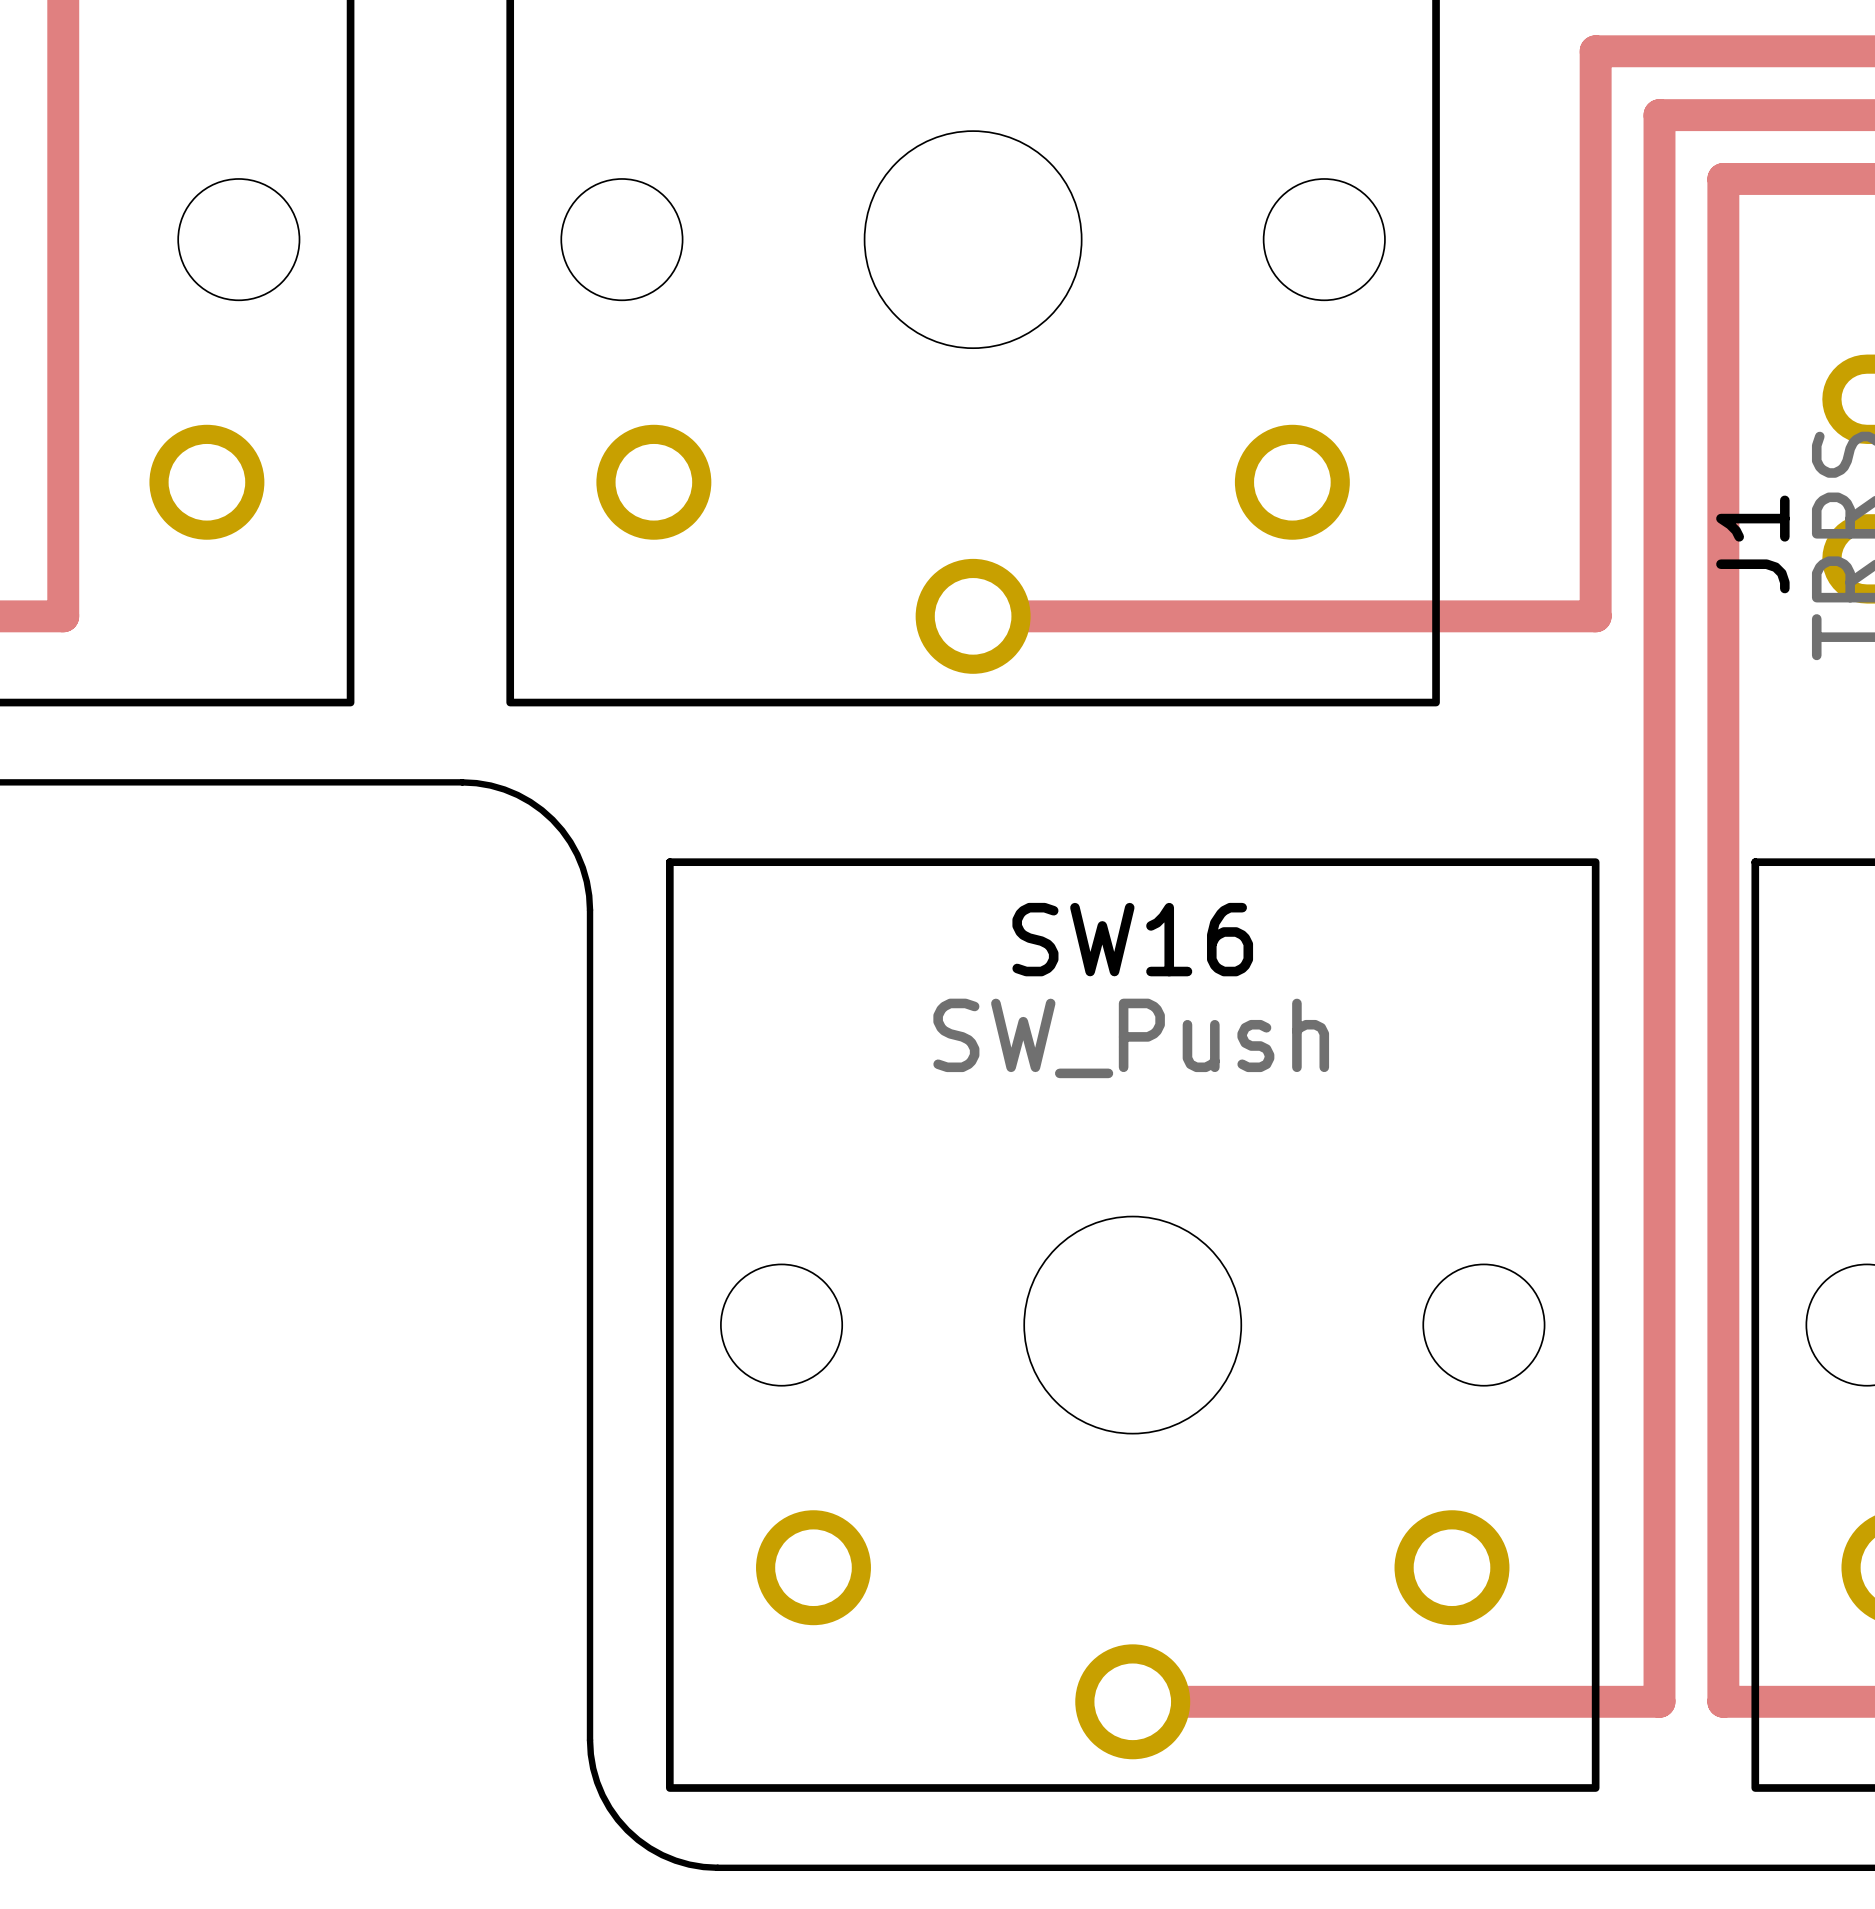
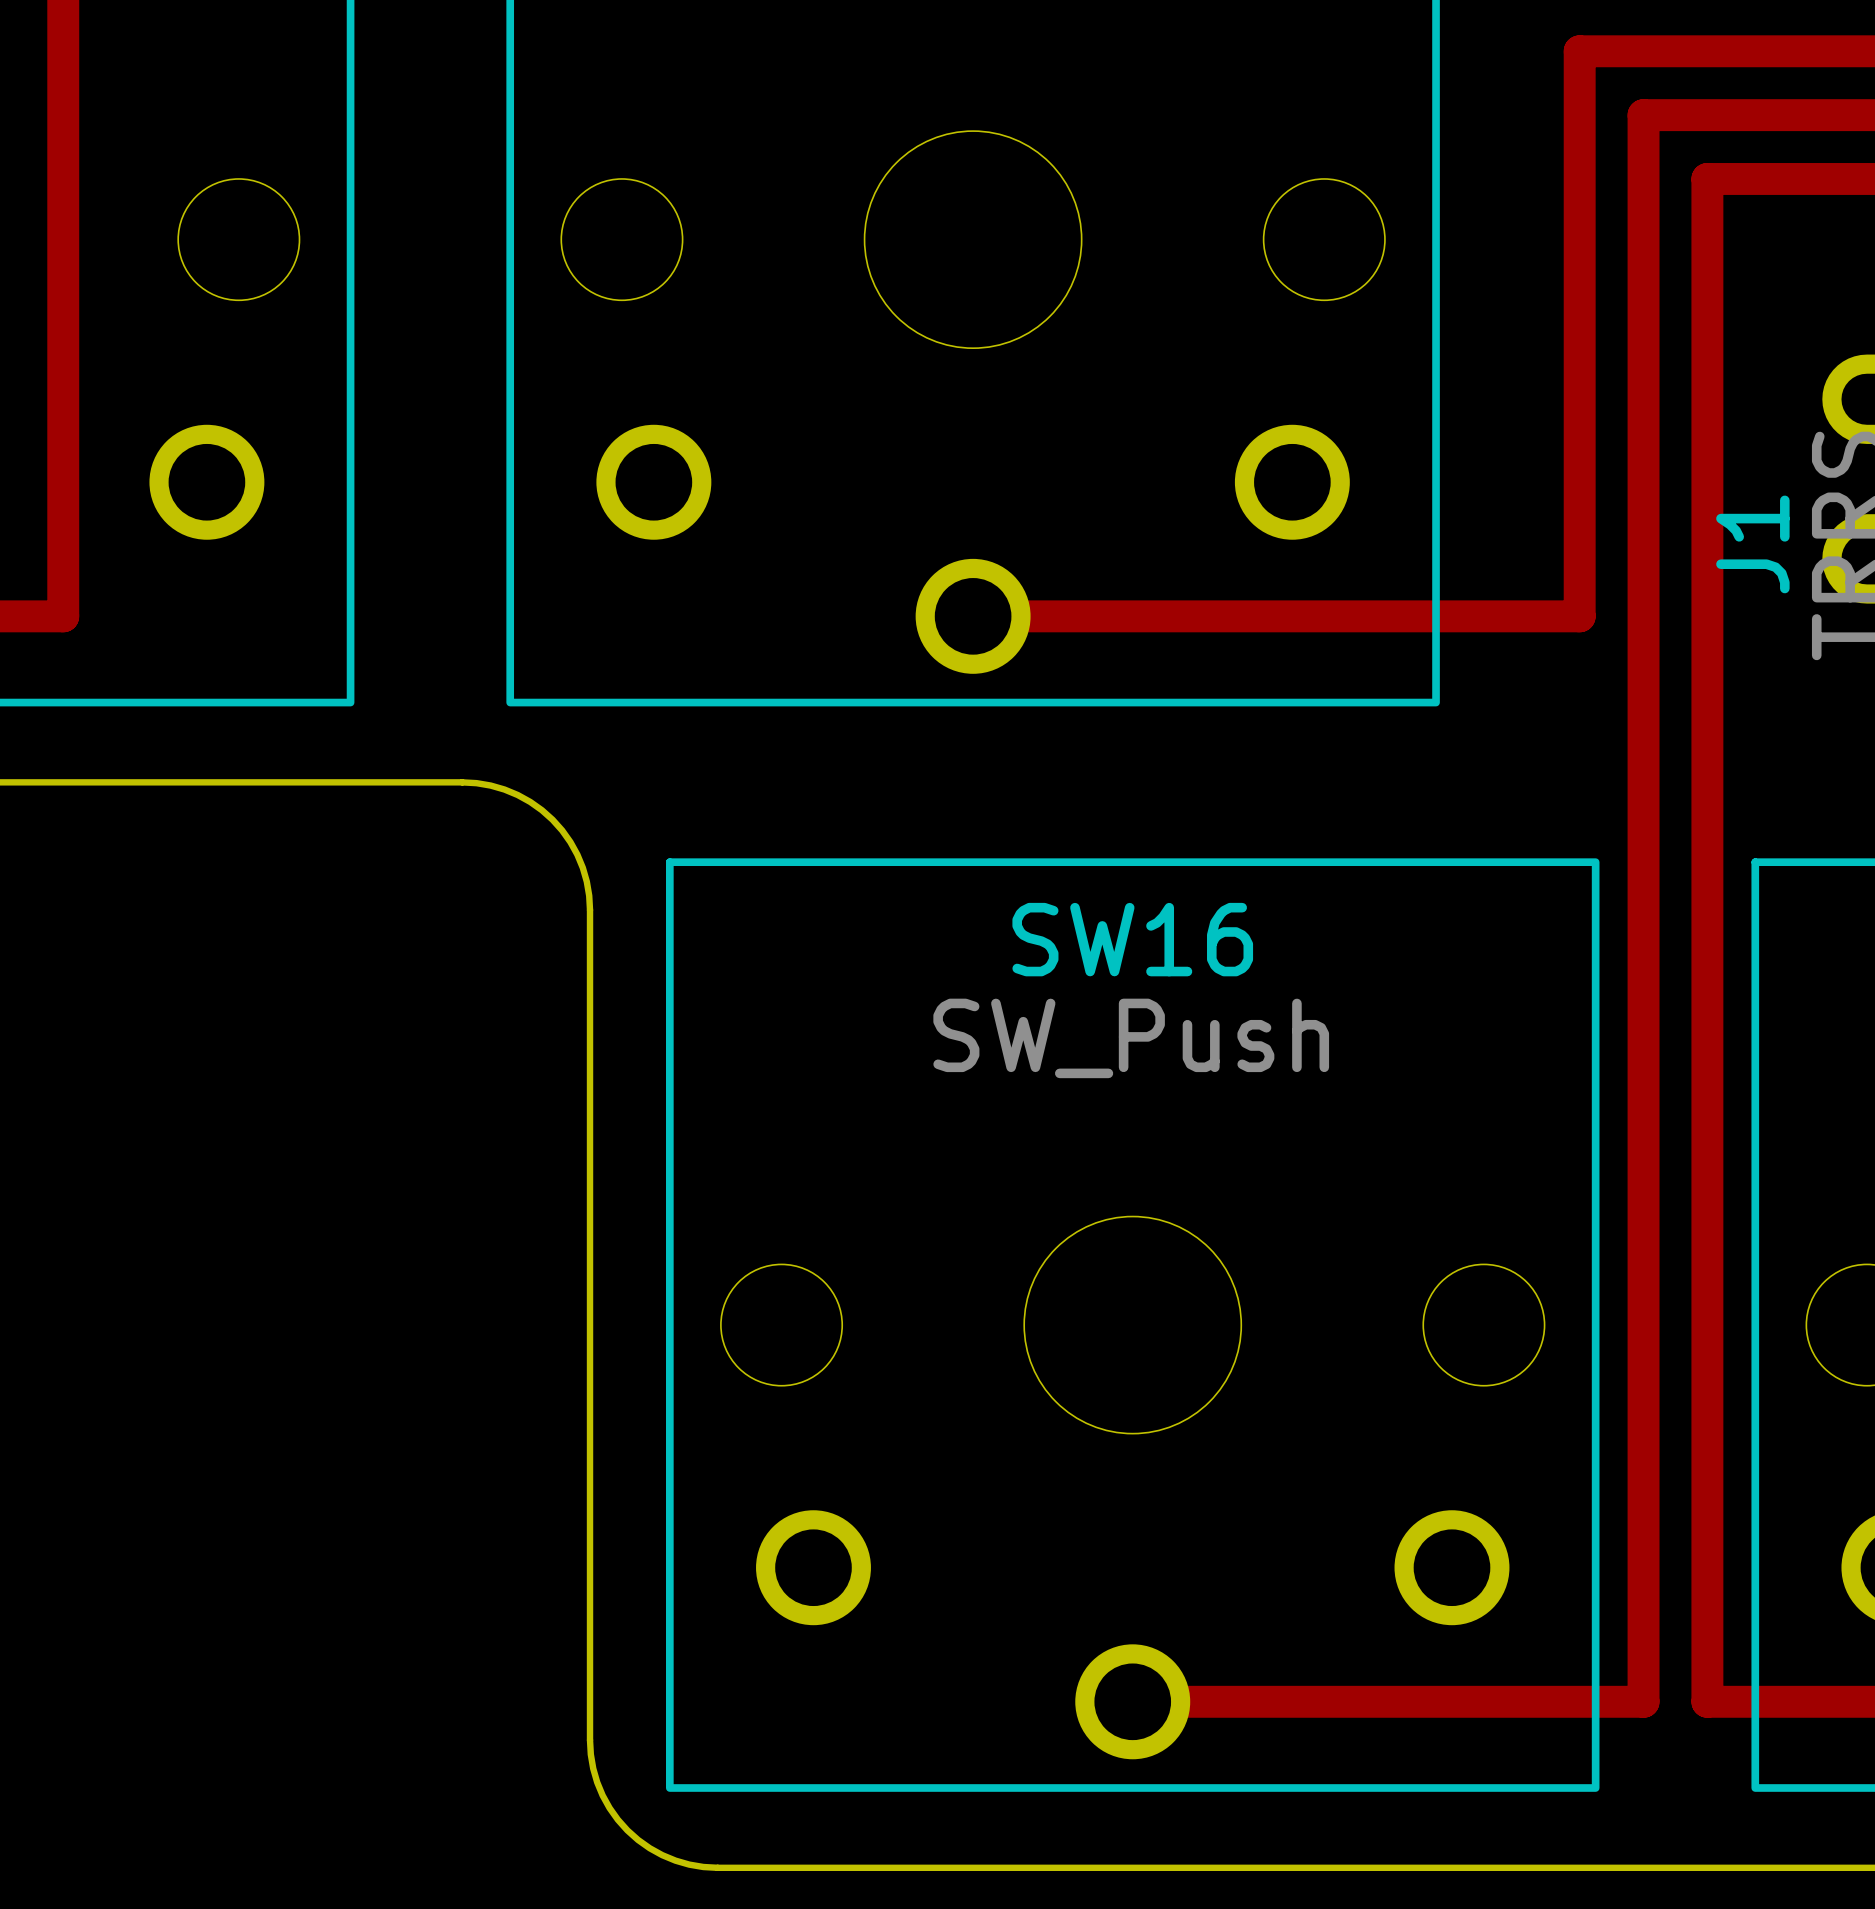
top track: (1595, 51) (1595, 616) (1579, 616) -> (1595, 51) (1579, 51) (1579, 616)
top track: (1659, 115) (1659, 1701) (1643, 1701) -> (1659, 115) (1643, 115) (1643, 1701)
top track: (1723, 178) (1723, 1701) -> (1723, 178) (1707, 178) (1707, 1701) (1723, 1701)

